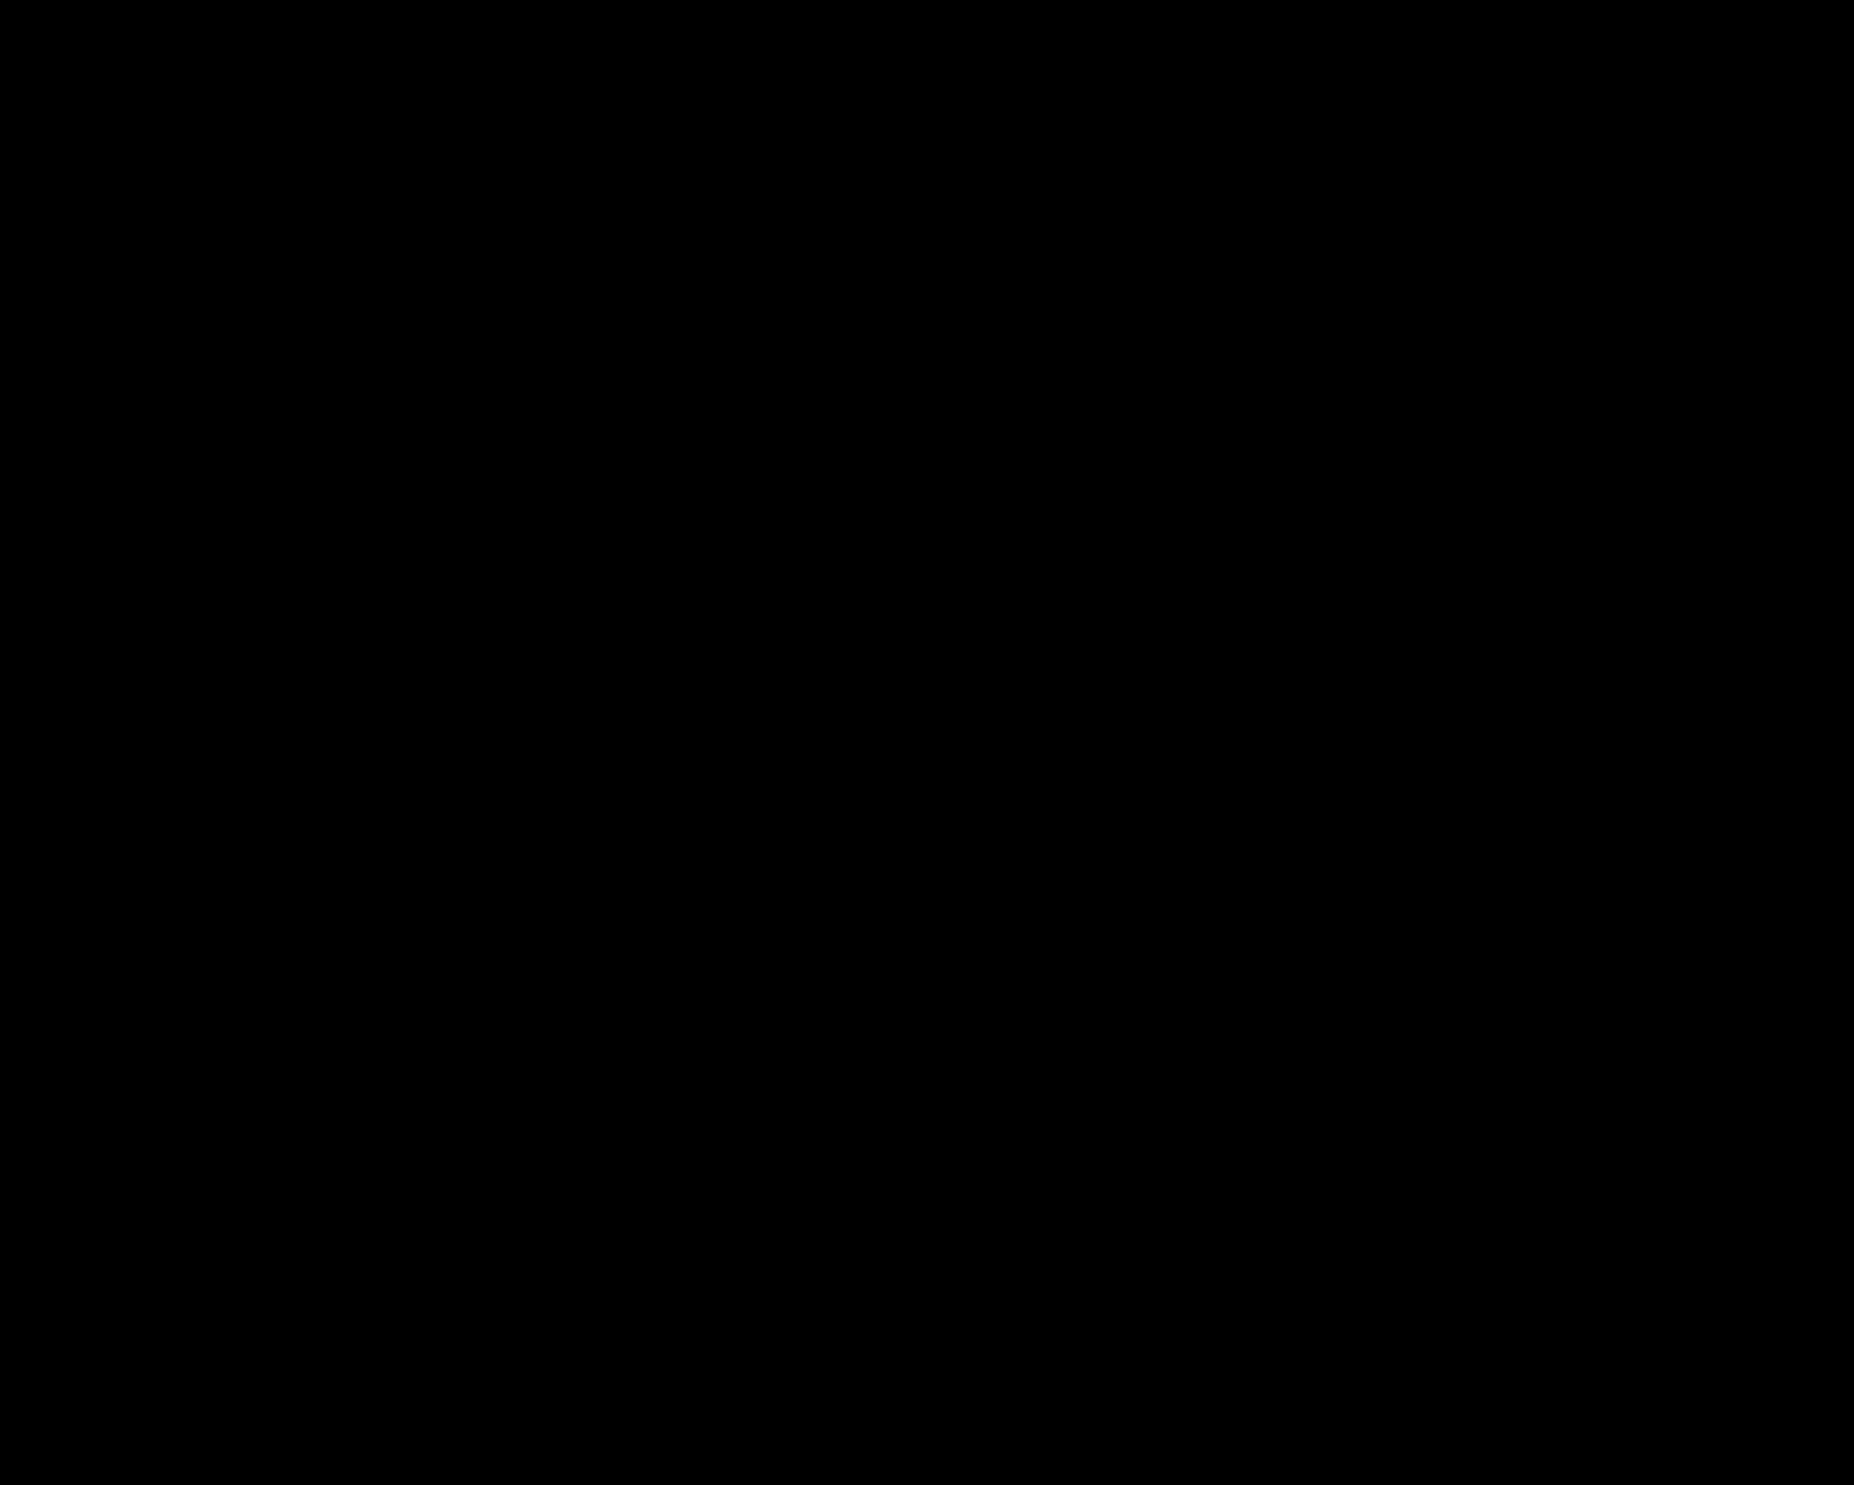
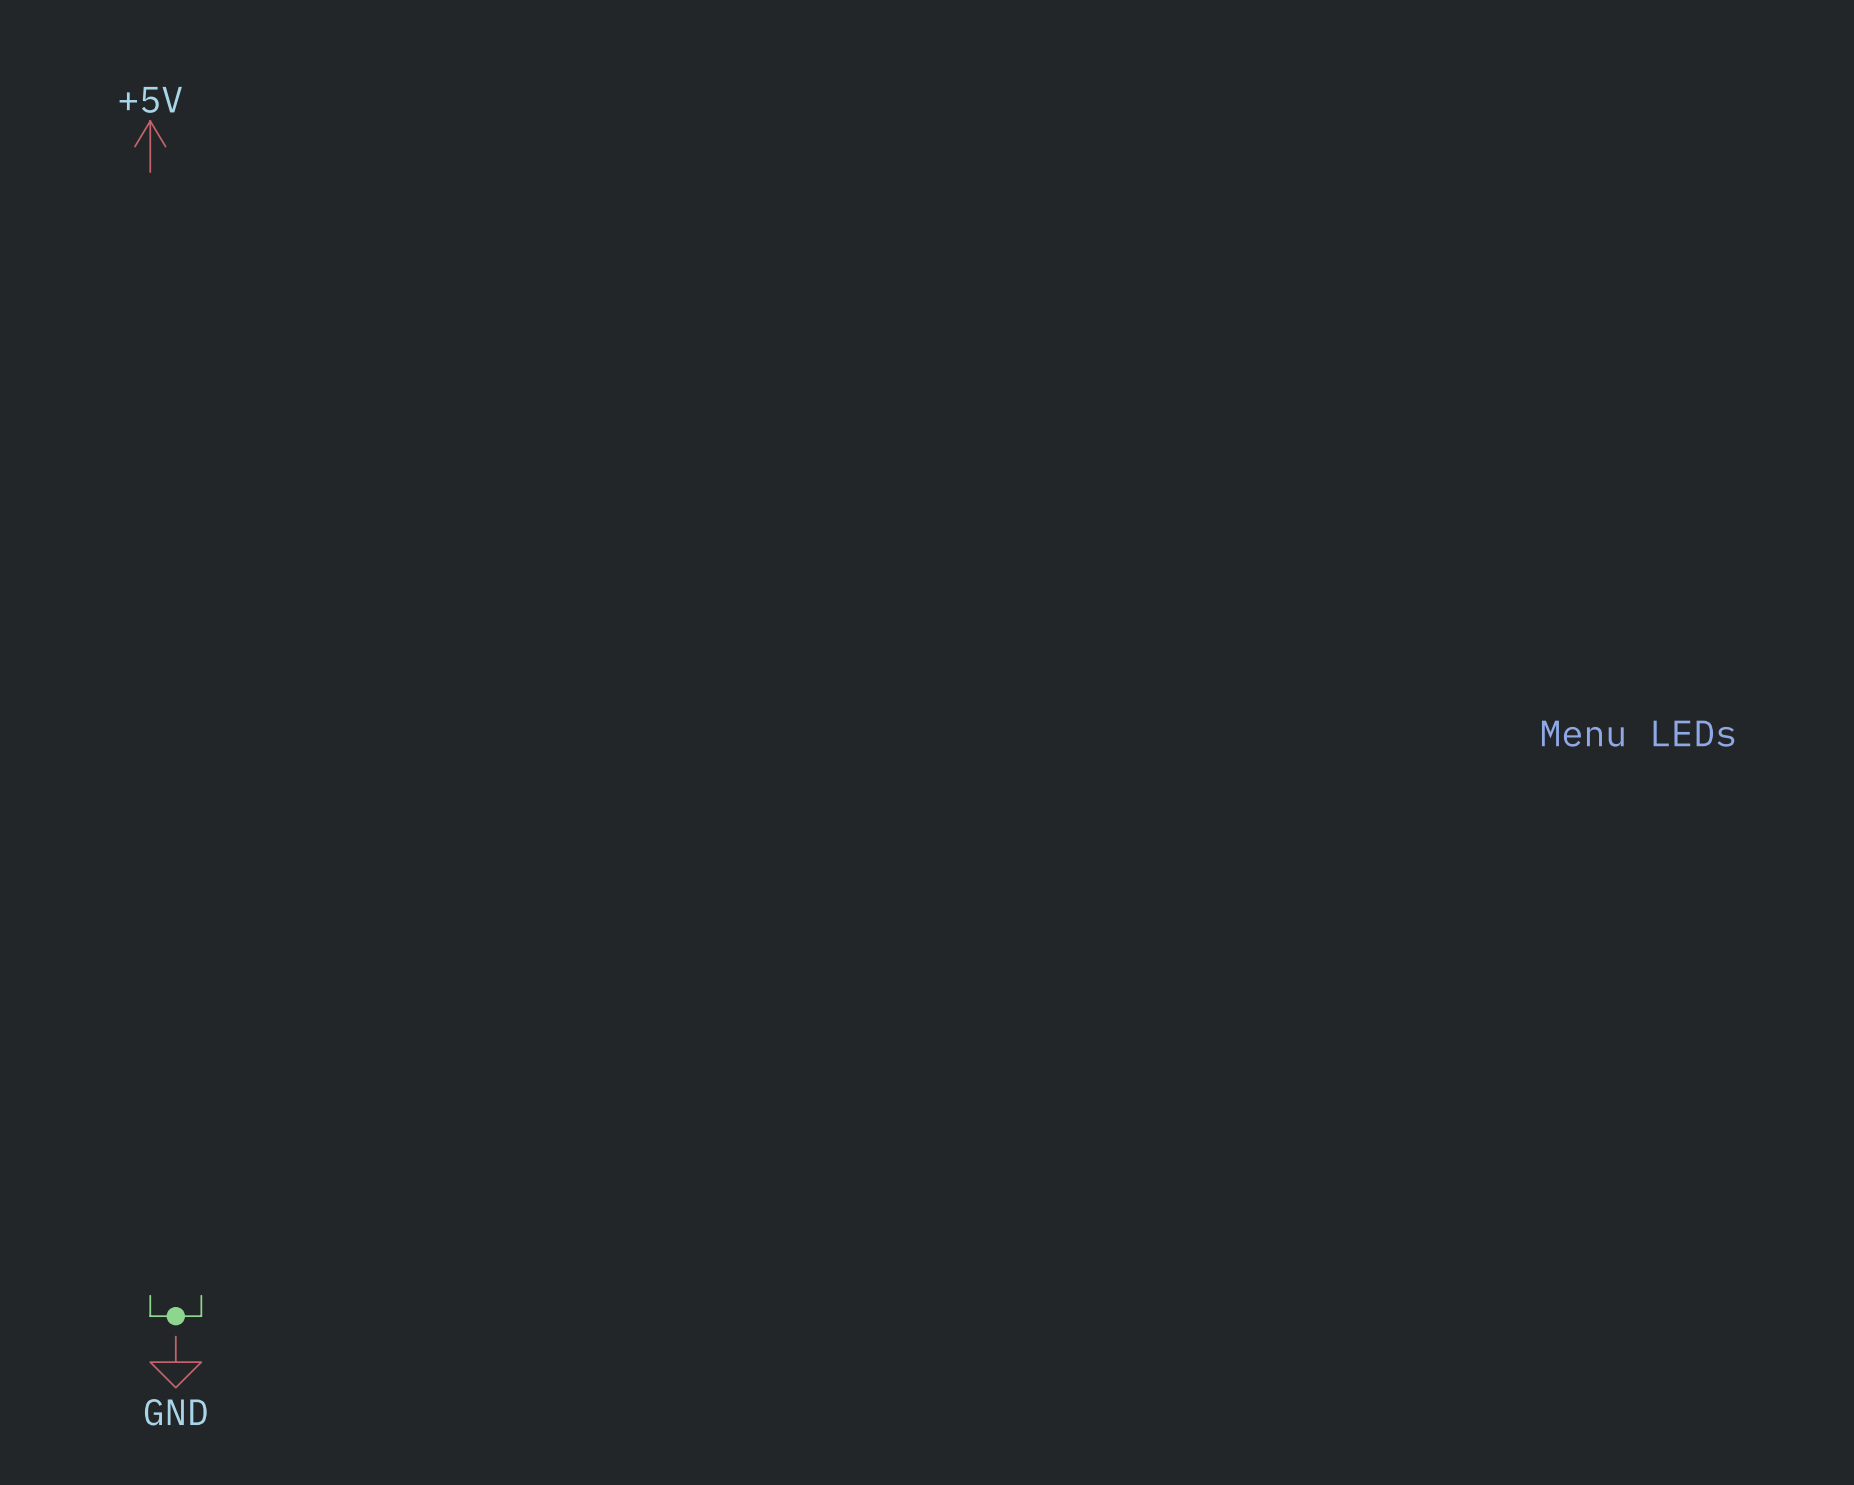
power symbol: none -> +5V (150, 146)
text: none -> Menu LEDs (1638, 733)
wire: none -> (150, 1295) (150, 1316) (201, 1316) (201, 1295)
junction: none -> (175, 1316)
power symbol: none -> GND (175, 1362)

